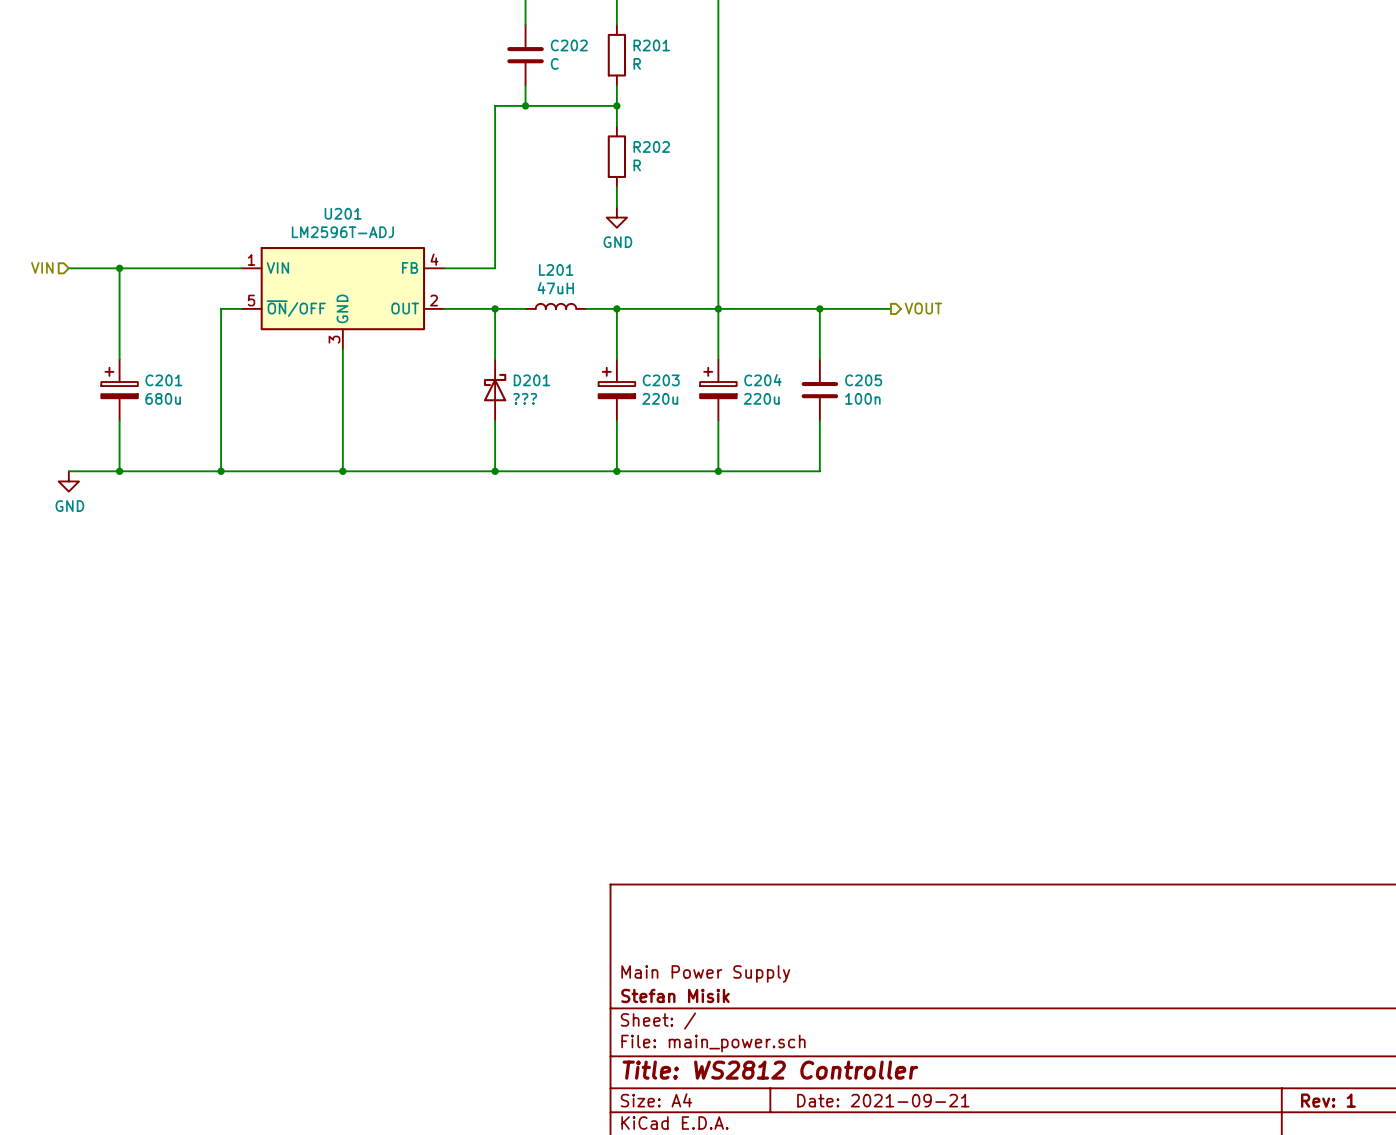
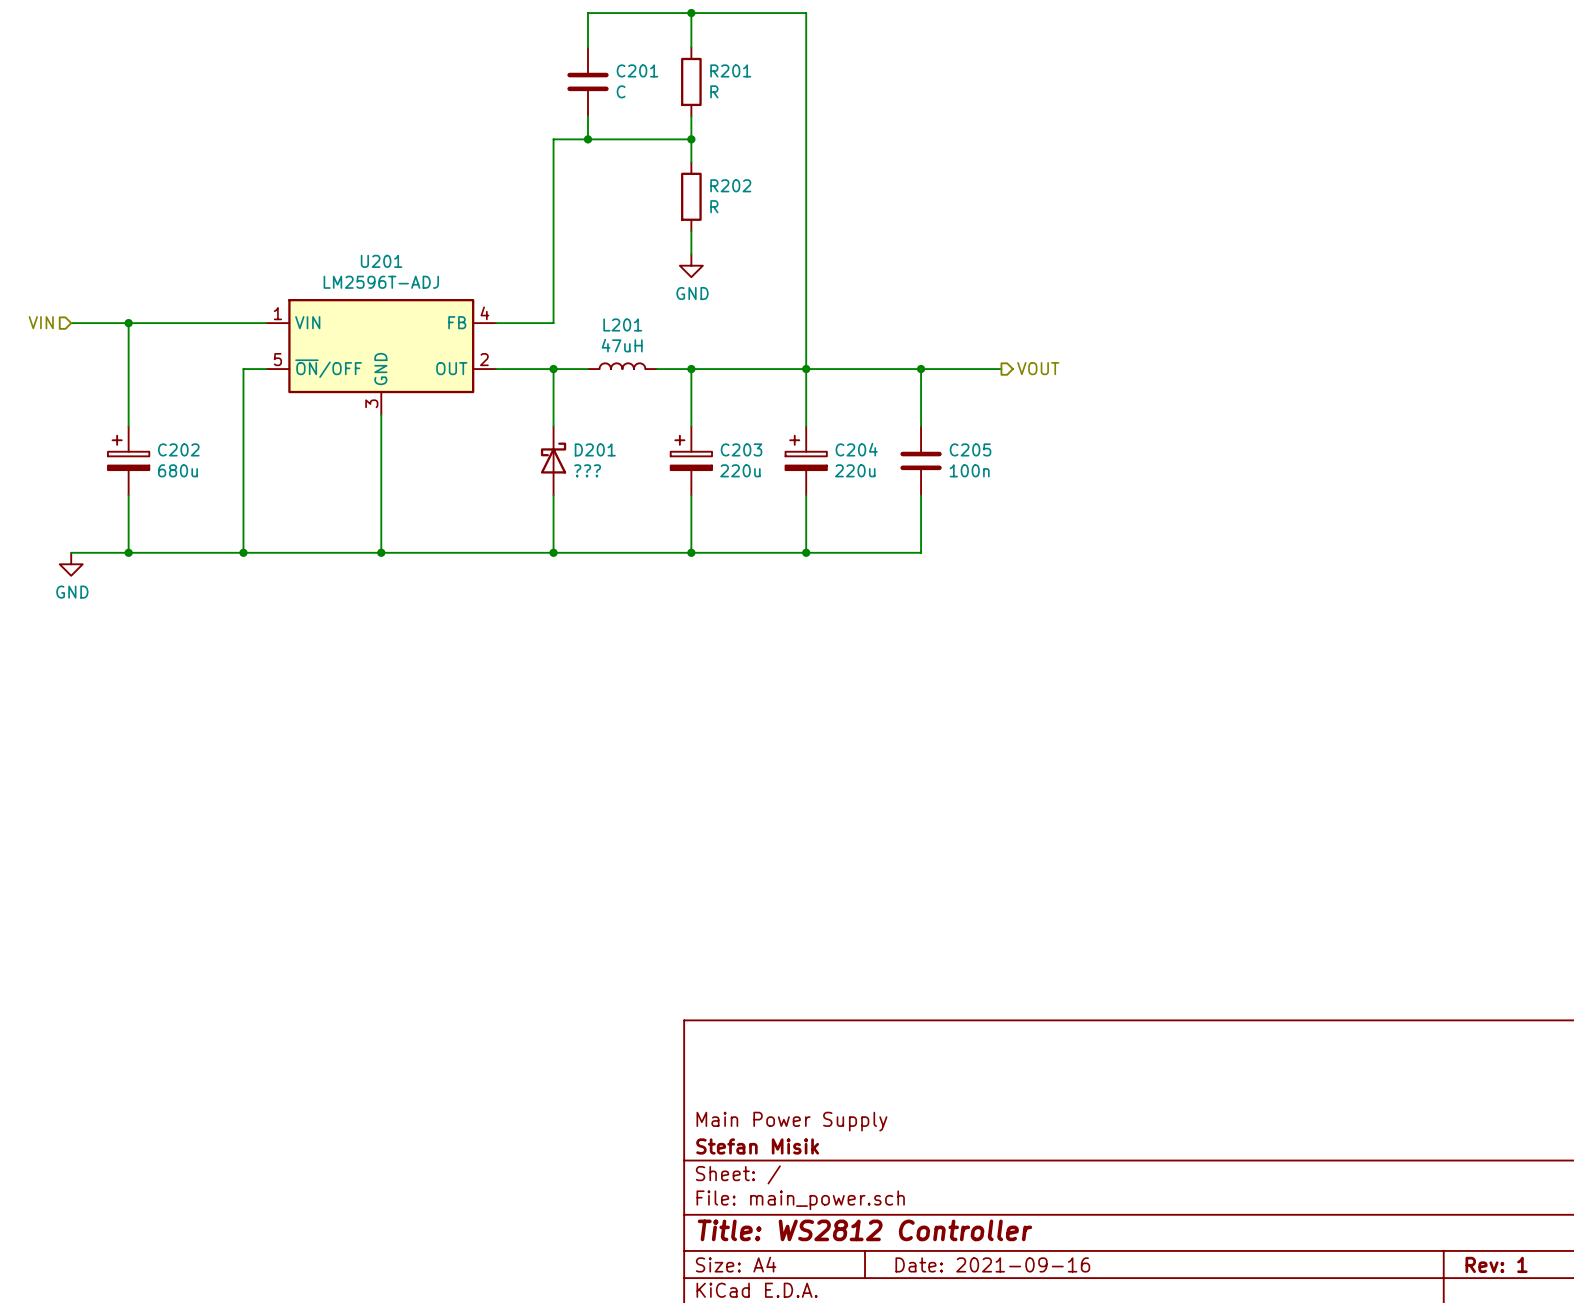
C202 name: C202 (569, 45) -> C201 (637, 70)
C201 name: C201 (163, 380) -> C202 (178, 449)
title block: Date: 2021-09-21 (883, 1100) -> Date: 2021-09-16 (992, 1264)

